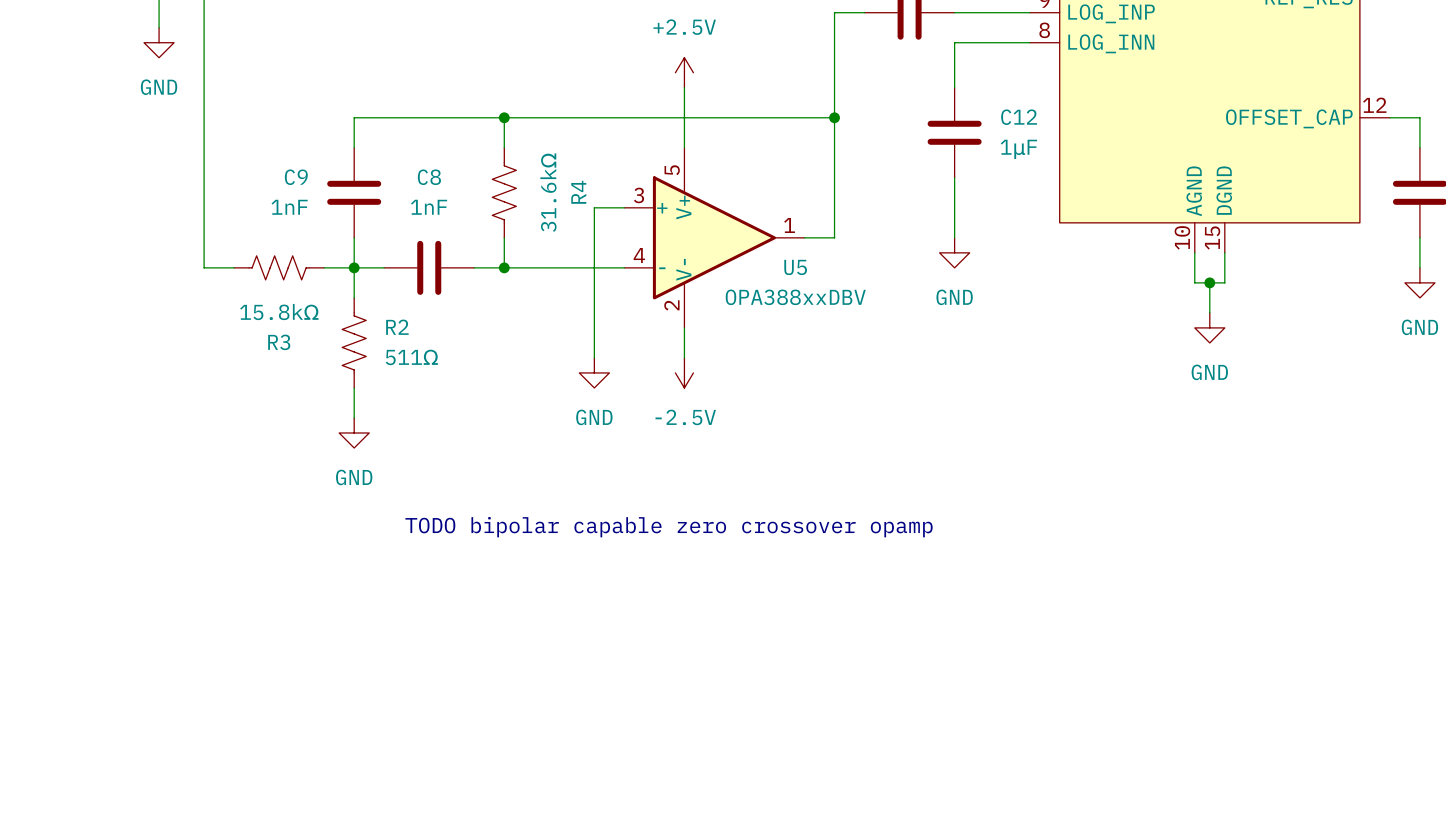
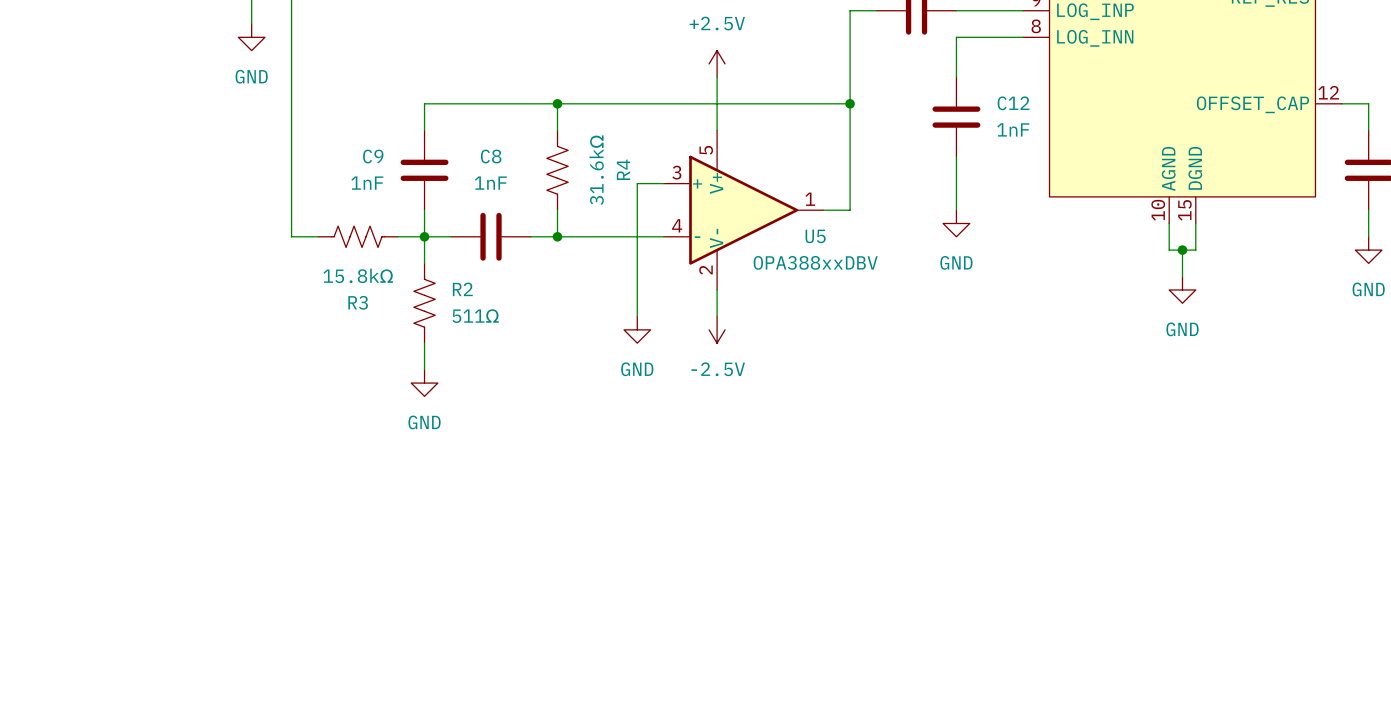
C12 value: 1μF (1018, 149) -> 1nF (1013, 129)
text: TODO bipolar capable zero crossover opamp (669, 527) -> none

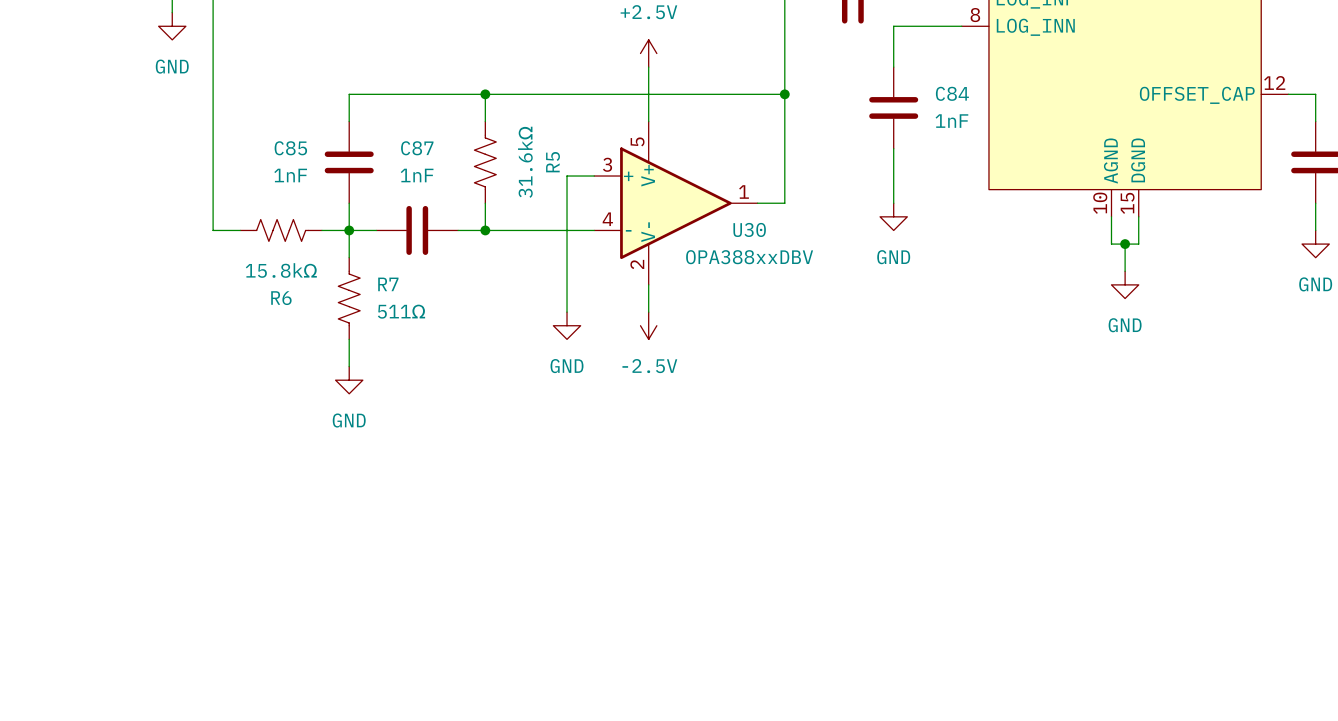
C12 name: C12 (1013, 103) -> C84 (952, 93)
C9 name: C9 (373, 156) -> C85 (290, 148)
C8 name: C8 (491, 156) -> C87 (417, 148)
R4 name: R4 (623, 169) -> R5 (553, 162)
U5 name: U5 (815, 236) -> U30 (749, 229)
R2 name: R2 (462, 289) -> R7 (388, 284)
R3 name: R3 (358, 302) -> R6 (281, 298)

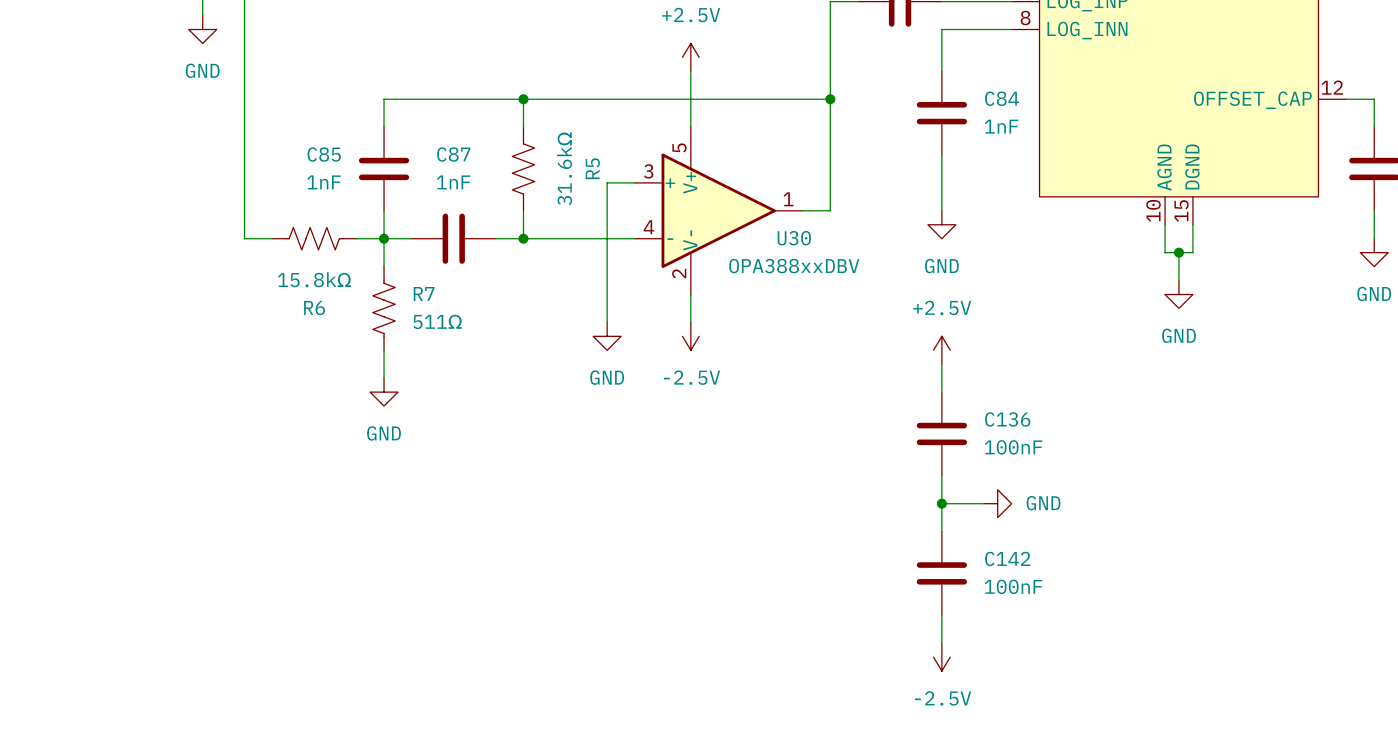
power symbol: none -> +2.5V (941, 350)
wire: none -> (941, 364) (941, 392)
C136: none -> 100nF (941, 433)
wire: none -> (941, 475) (941, 531)
wire: none -> (941, 503) (983, 503)
junction: none -> (941, 503)
power symbol: none -> GND (997, 503)
C142: none -> 100nF (941, 573)
wire: none -> (941, 615) (941, 643)
power symbol: none -> -2.5V (941, 657)

